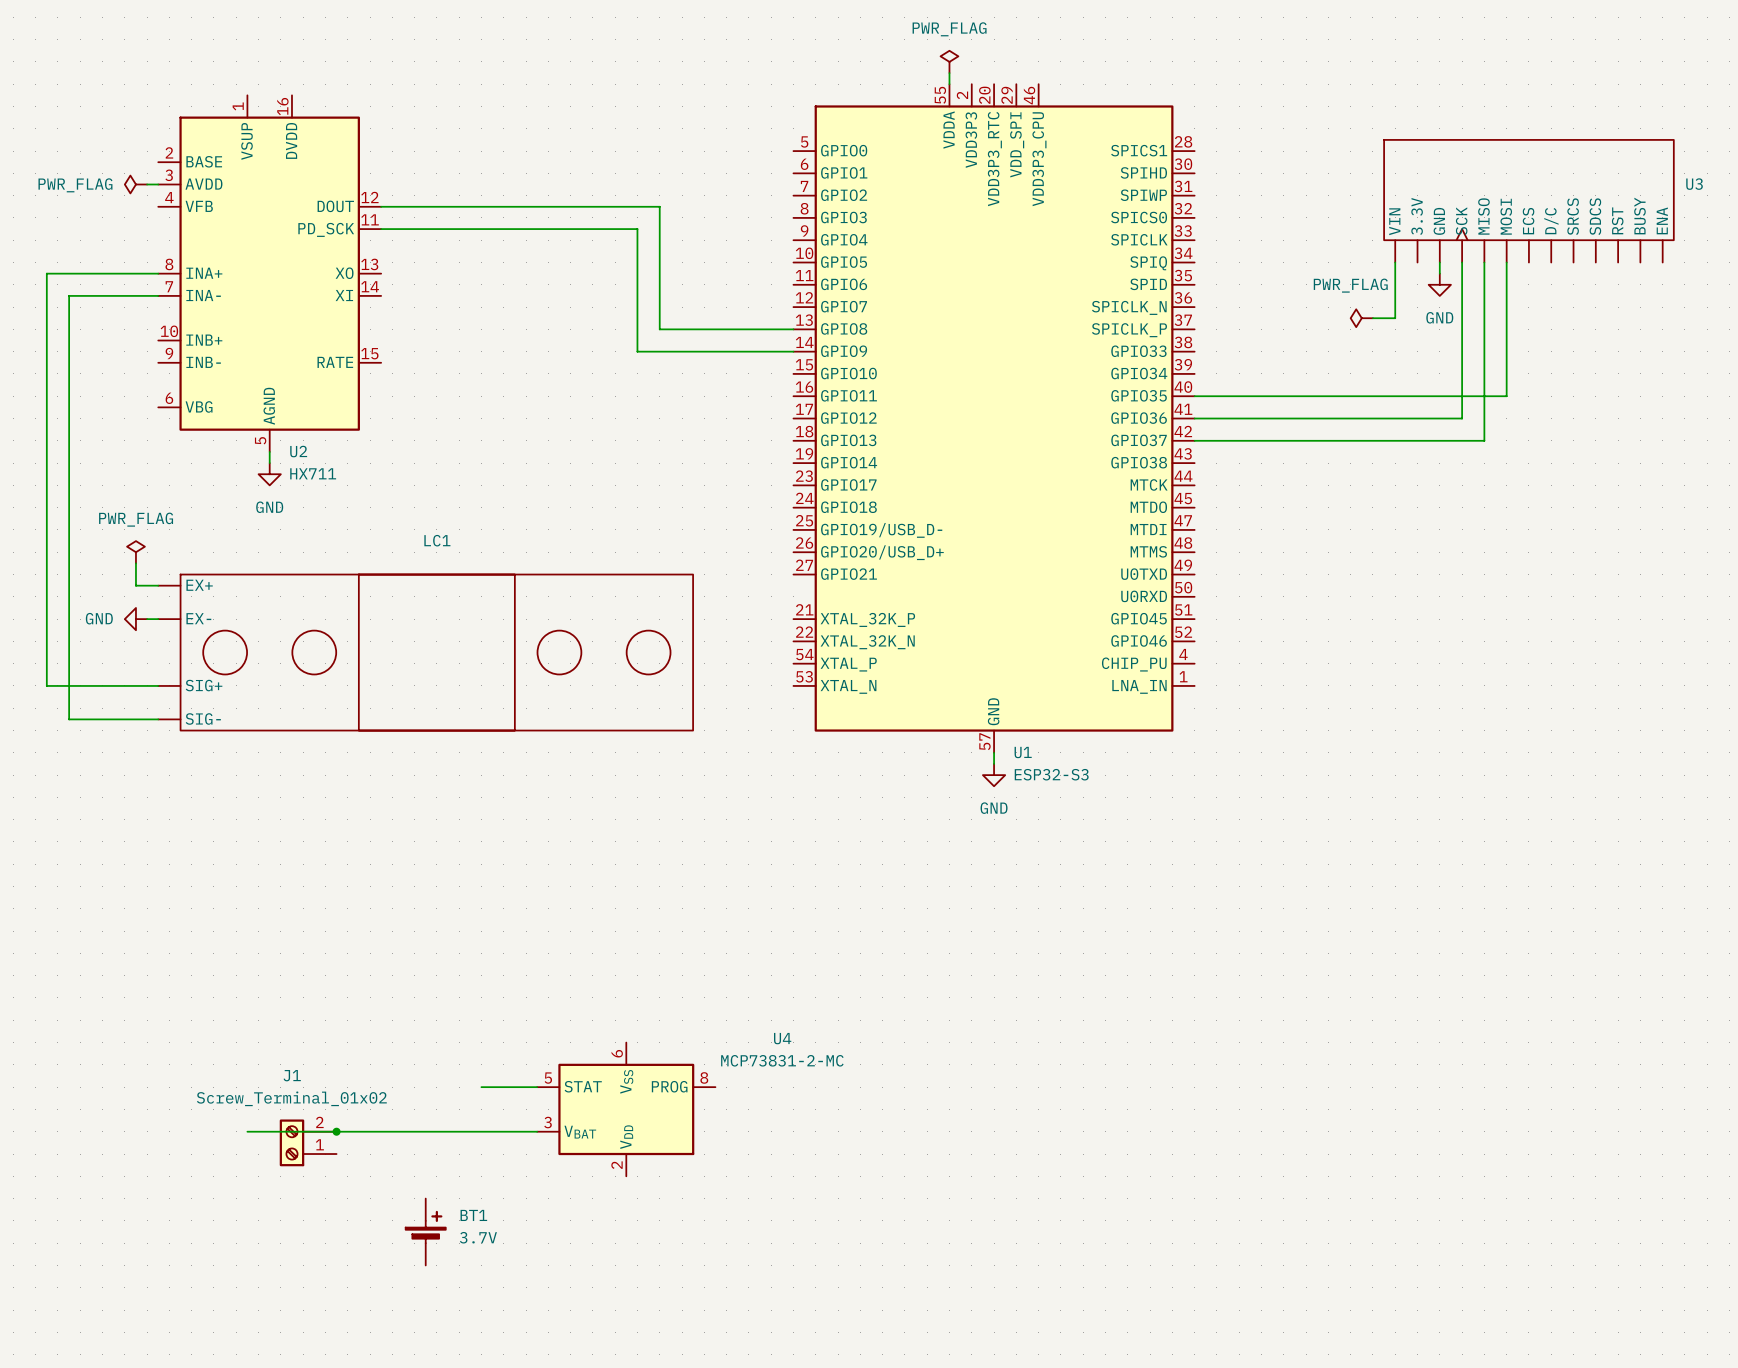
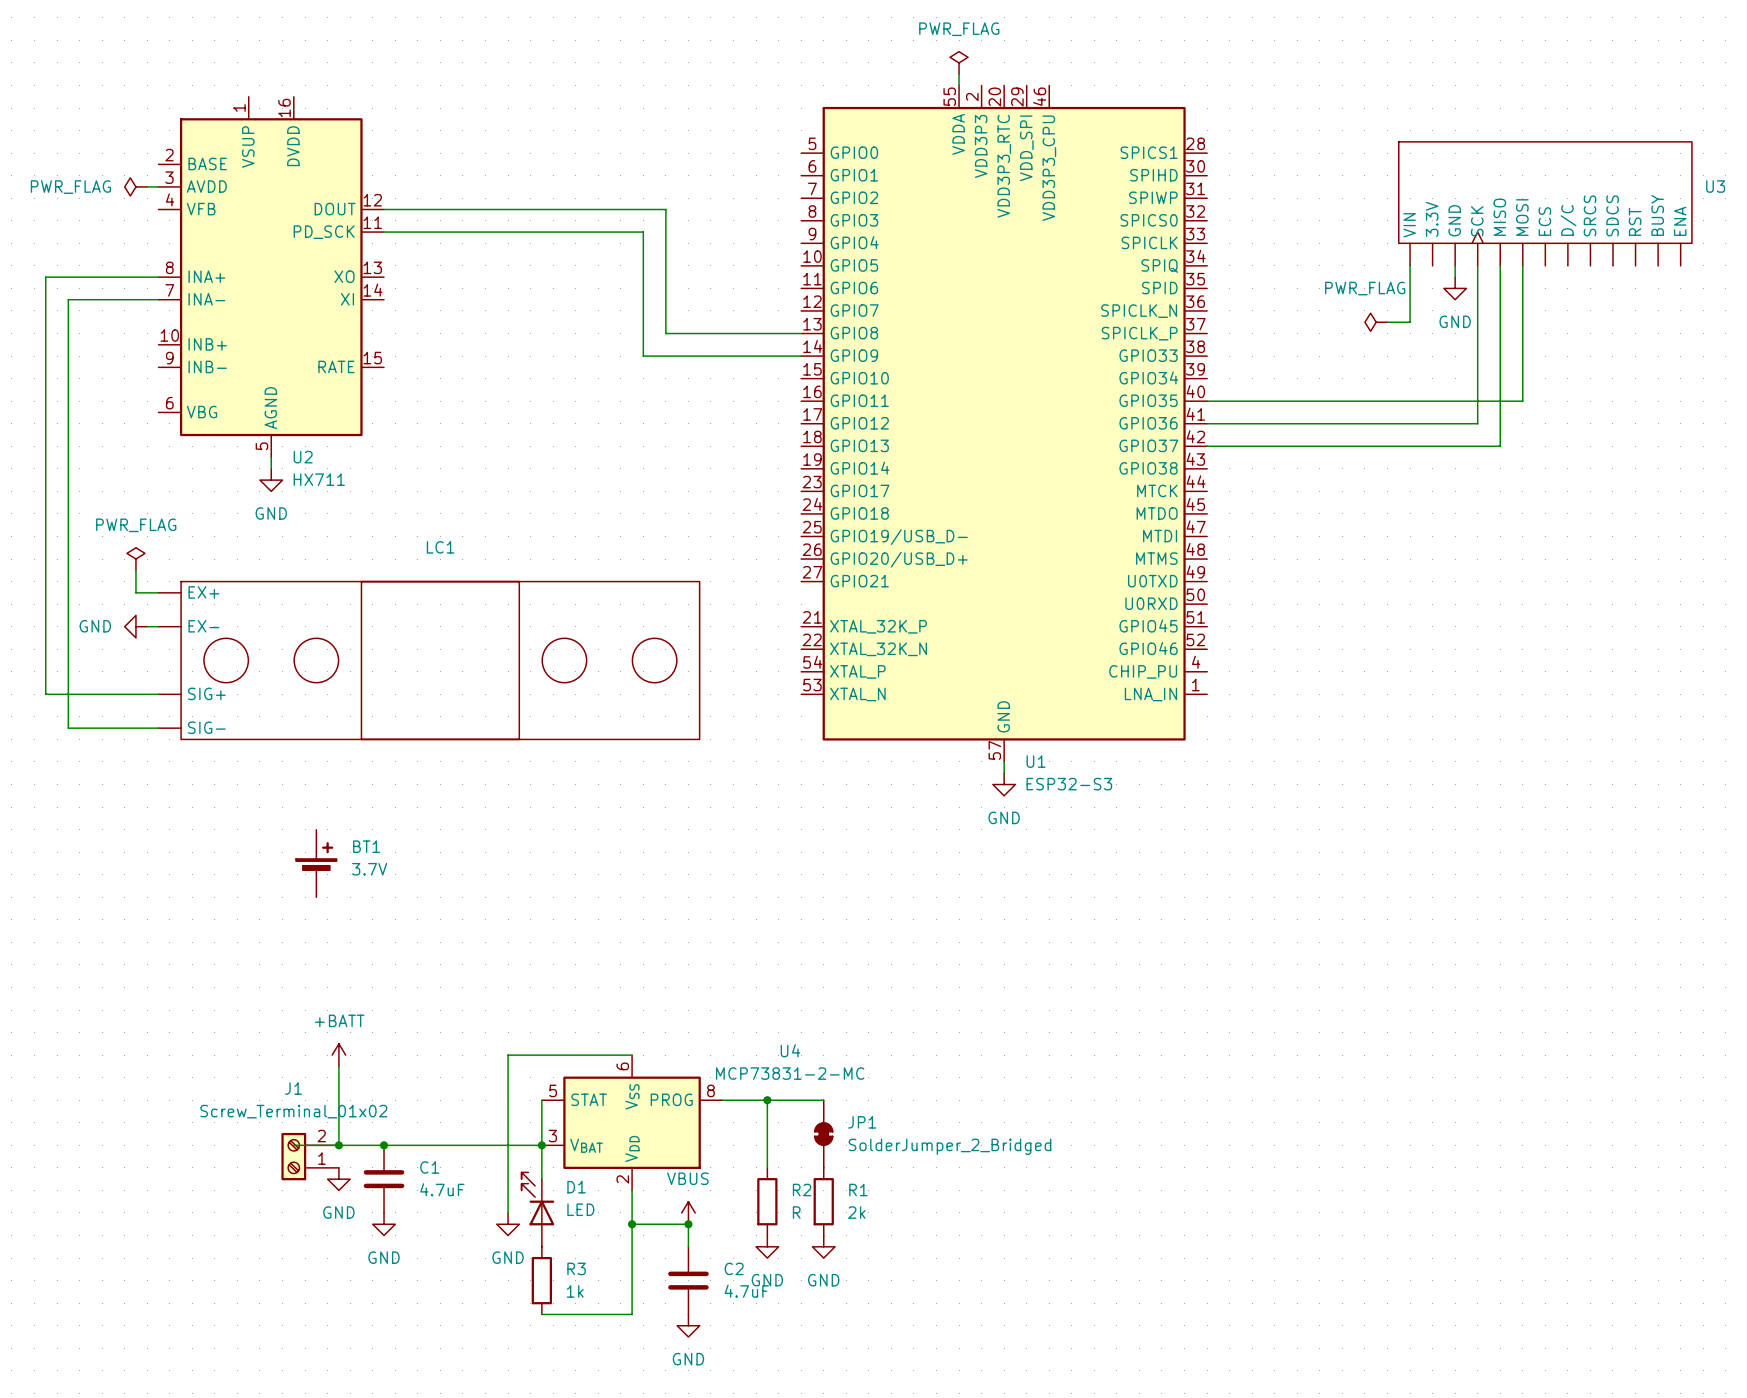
power symbol: none -> +BATT (338, 1055)
wire: none -> (632, 1055) (508, 1055) (508, 1212)
wire: none -> (338, 1066) (338, 1145)
wire: (481, 1087) (537, 1087) -> (541, 1179) (541, 1100)
wire: none -> (722, 1100) (823, 1100)
wire: none -> (767, 1100) (767, 1167)
junction: none -> (767, 1100)
JP1: none -> SolderJumper_2_Bridged (823, 1134)
wire: (247, 1131) (291, 1131) -> none
junction: none -> (384, 1145)
junction: none -> (541, 1145)
power symbol: none -> GND (338, 1179)
C1: none -> 4.7uF (384, 1179)
wire: none -> (632, 1190) (632, 1314) (541, 1314)
R2: none -> R (767, 1201)
R1: none -> 2k (823, 1201)
D1: none -> LED (537, 1209)
power symbol: none -> VBUS (688, 1212)
power symbol: none -> GND (384, 1224)
power symbol: none -> GND (508, 1224)
wire: none -> (632, 1224) (688, 1224) (688, 1246)
junction: none -> (632, 1224)
junction: none -> (688, 1224)
BT1 position: (425, 1232) -> (316, 863)
power symbol: none -> GND (767, 1246)
power symbol: none -> GND (823, 1246)
R3: none -> 1k (541, 1280)
C2: none -> 4.7uF (688, 1280)
power symbol: none -> GND (688, 1325)

